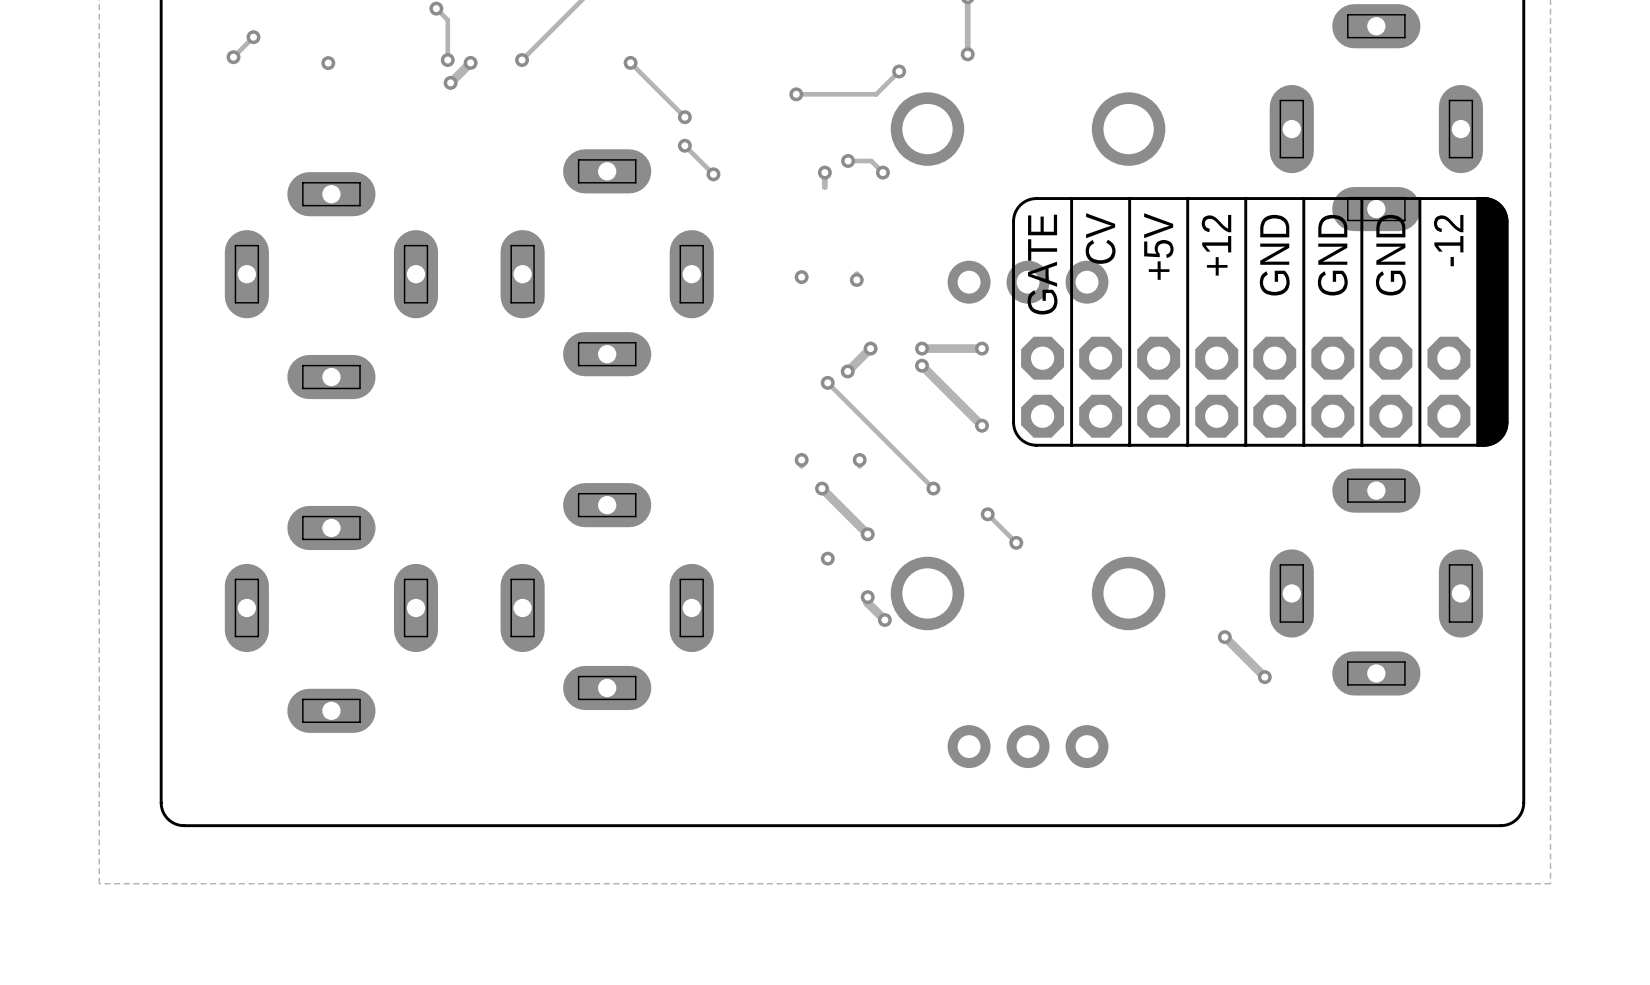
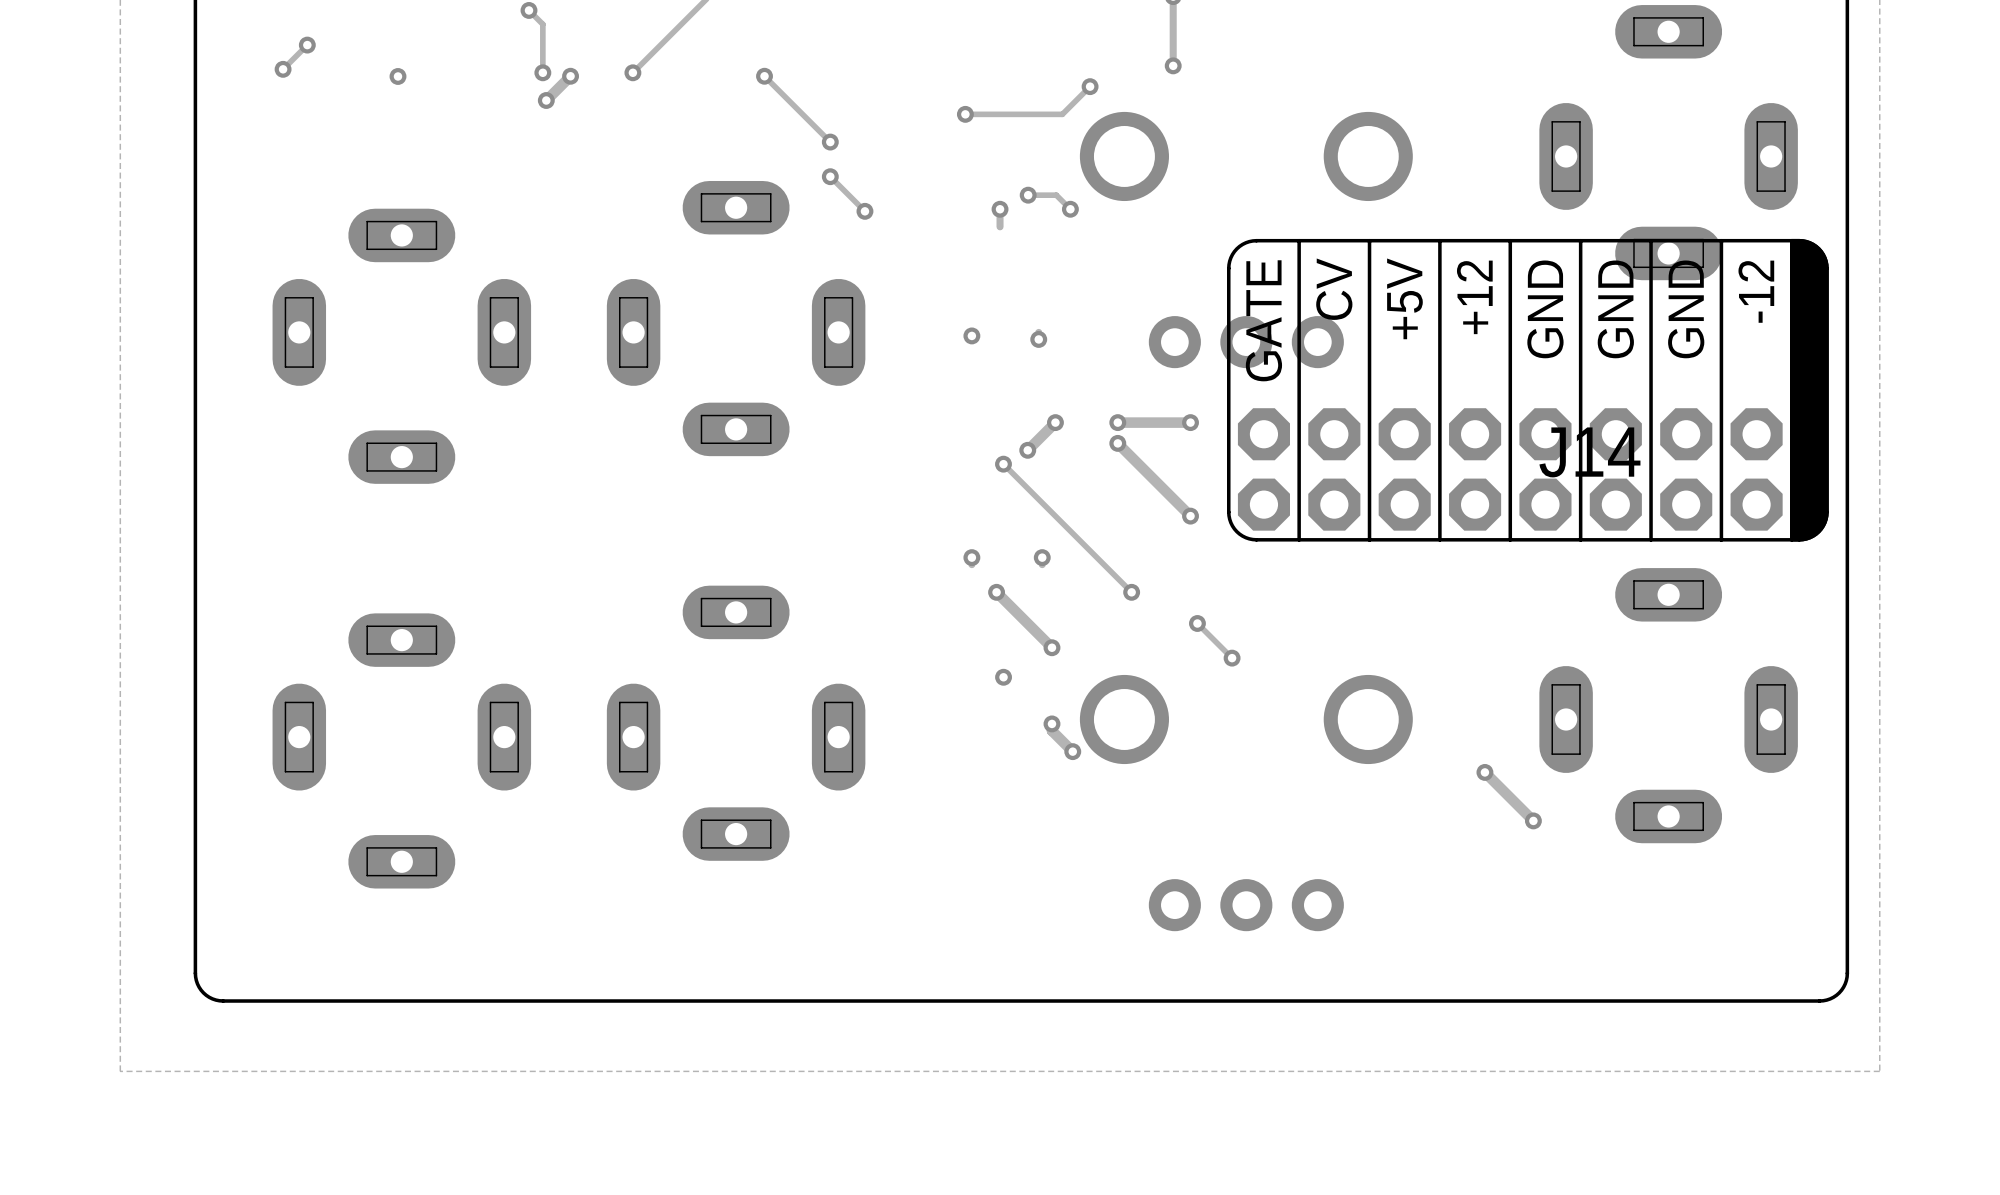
text: none -> J14 (1589, 452)

